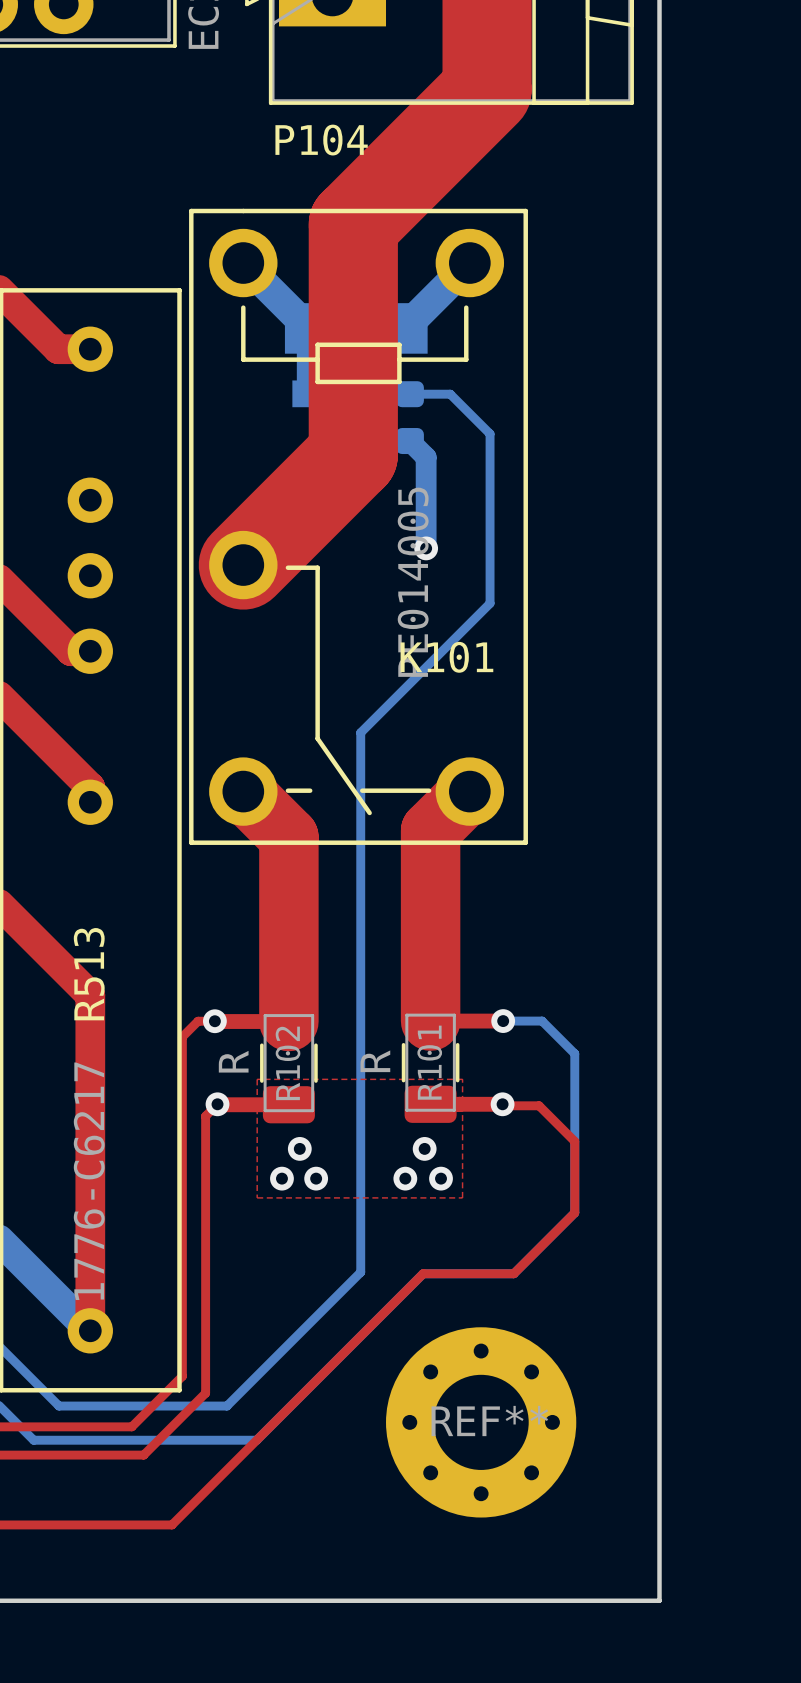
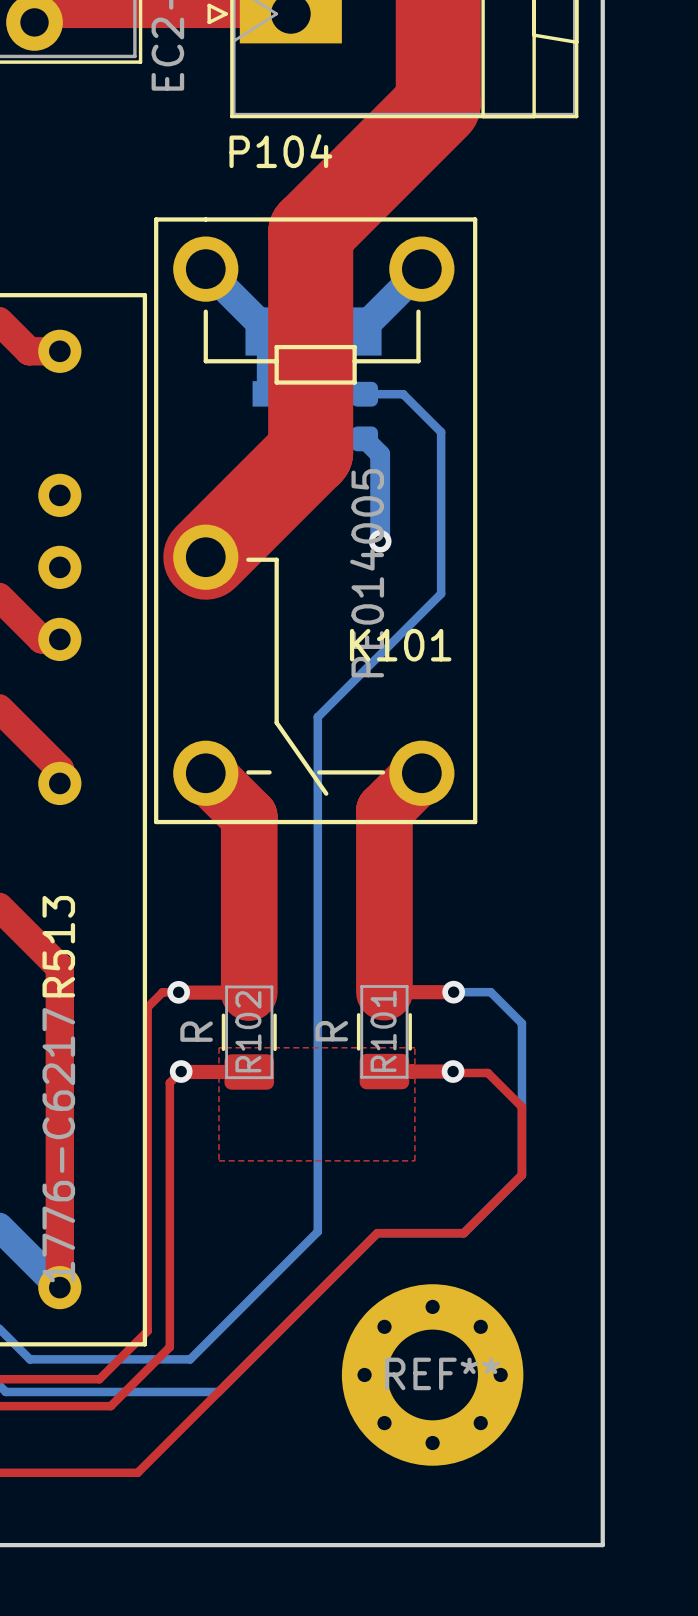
via: (299, 1148) -> none
via: (424, 1148) -> none
via: (281, 1178) -> none
via: (316, 1178) -> none
via: (405, 1178) -> none
via: (441, 1178) -> none

